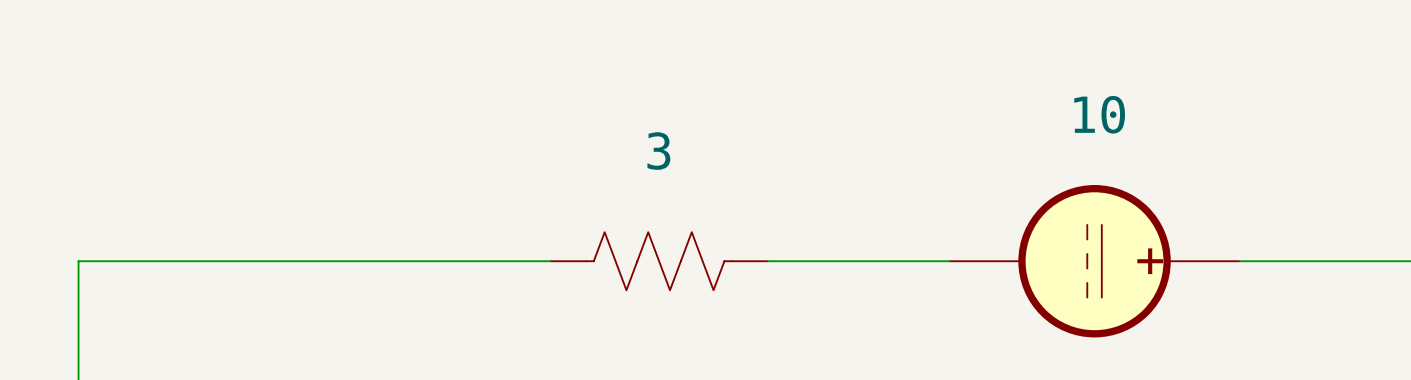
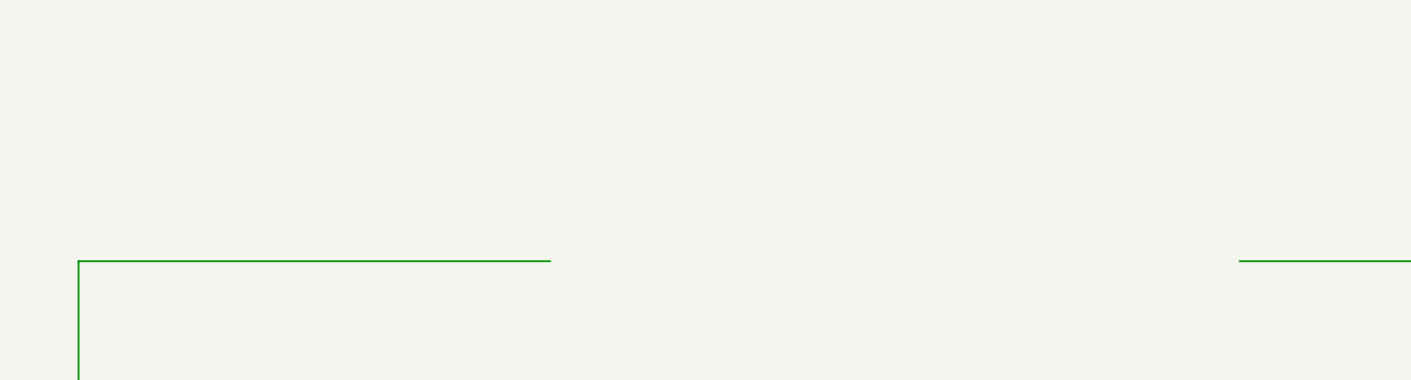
part: 3 (659, 261) -> none
wire: (767, 261) (949, 261) -> none
part: 10 (1094, 261) -> none

